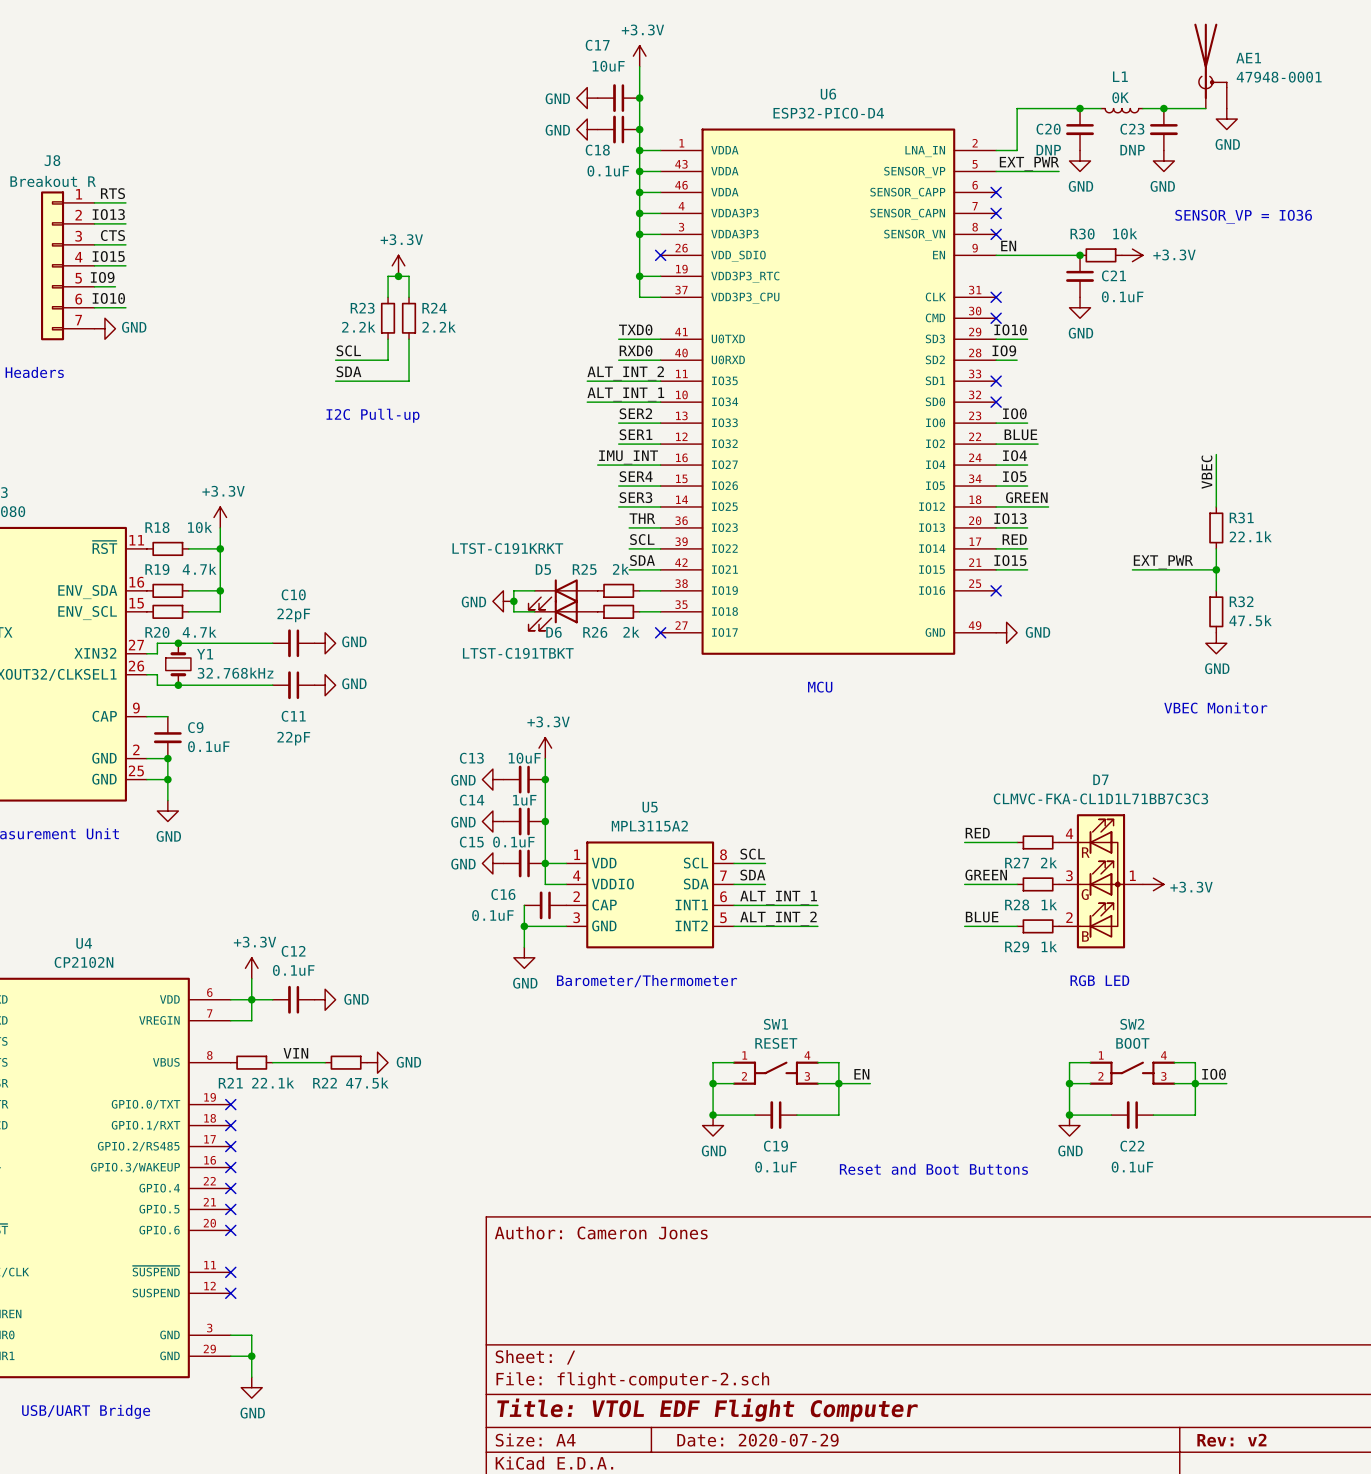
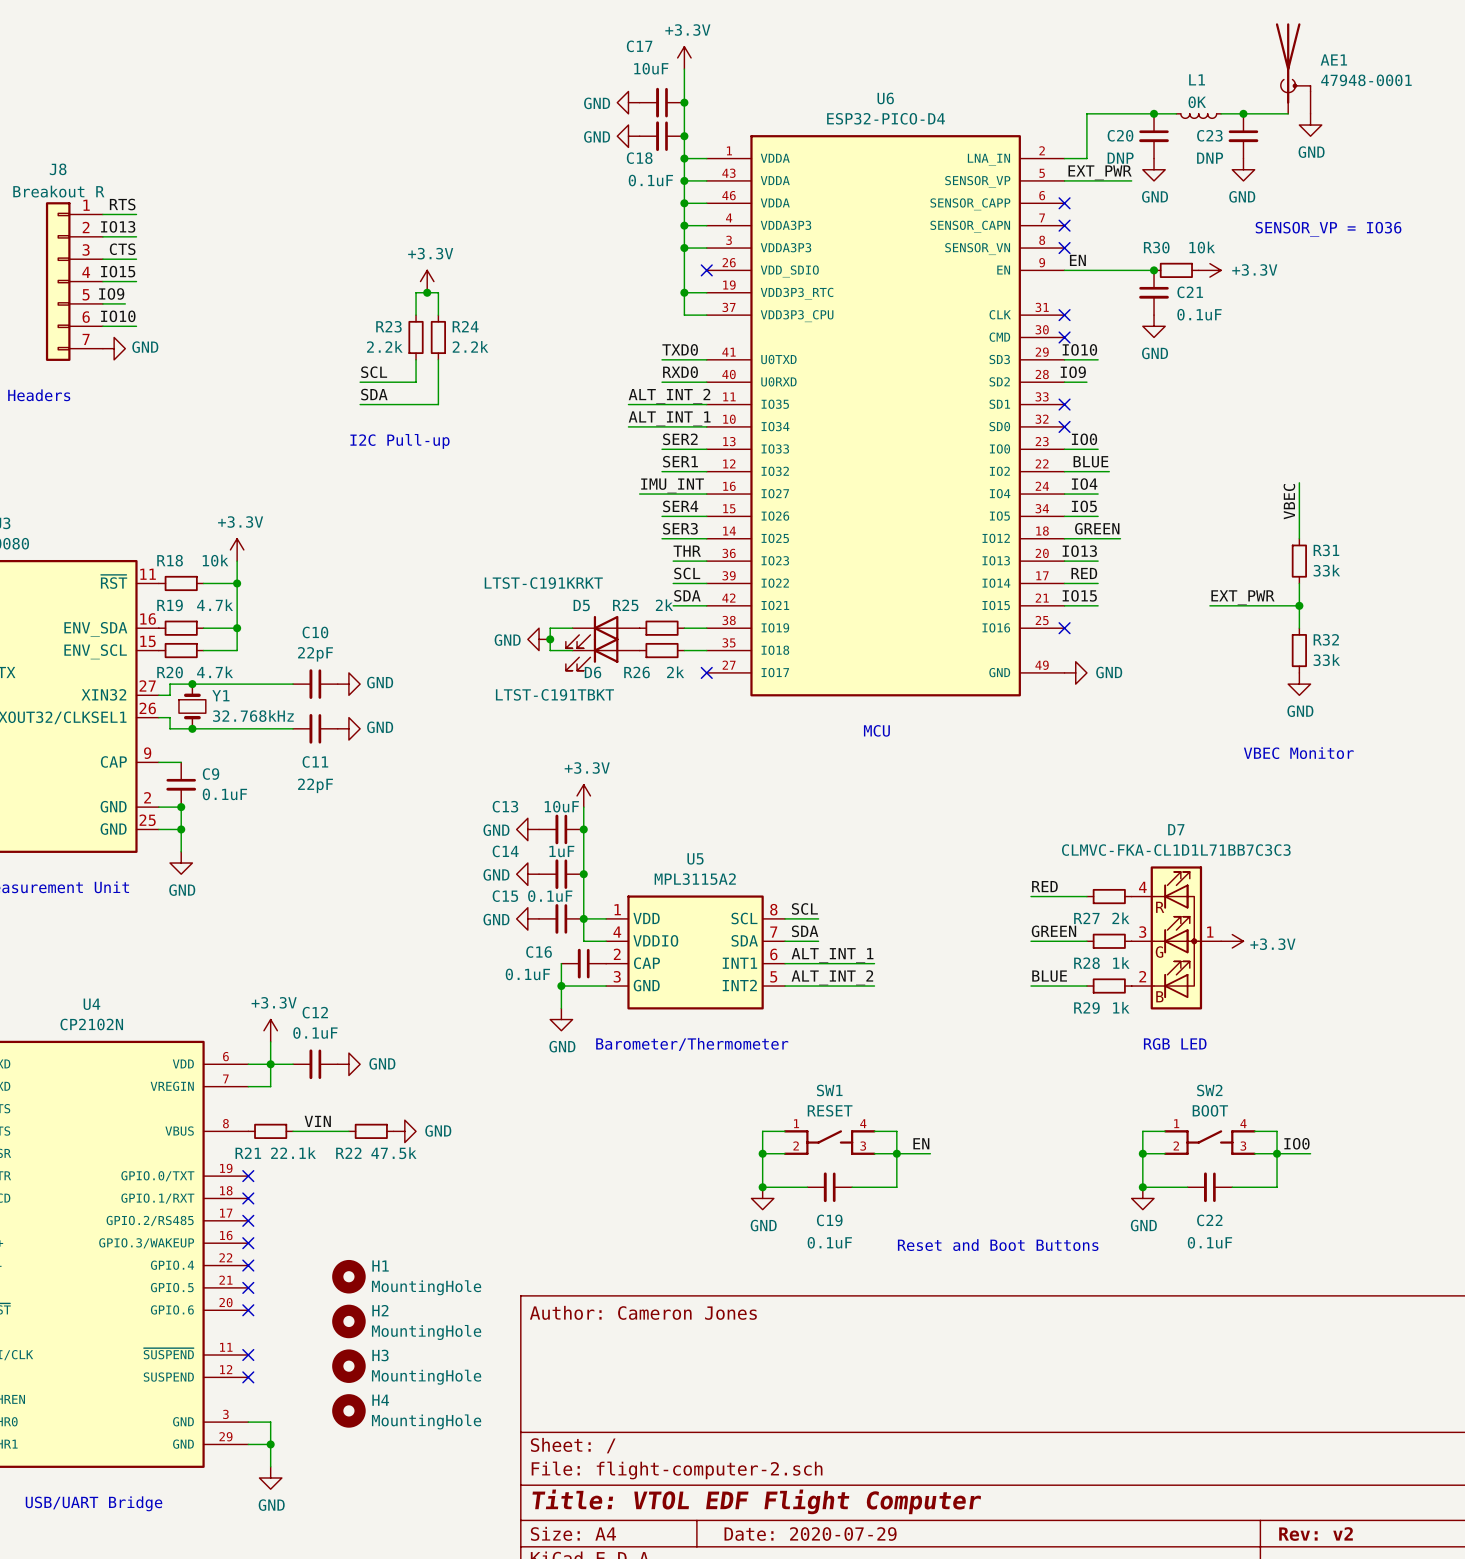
R31 value: 22.1k (1250, 536) -> 33k (1326, 570)
R32 value: 47.5k (1250, 620) -> 33k (1326, 660)
H1: none -> MountingHole (348, 1276)
H2: none -> MountingHole (348, 1321)
H3: none -> MountingHole (348, 1366)
H4: none -> MountingHole (348, 1410)

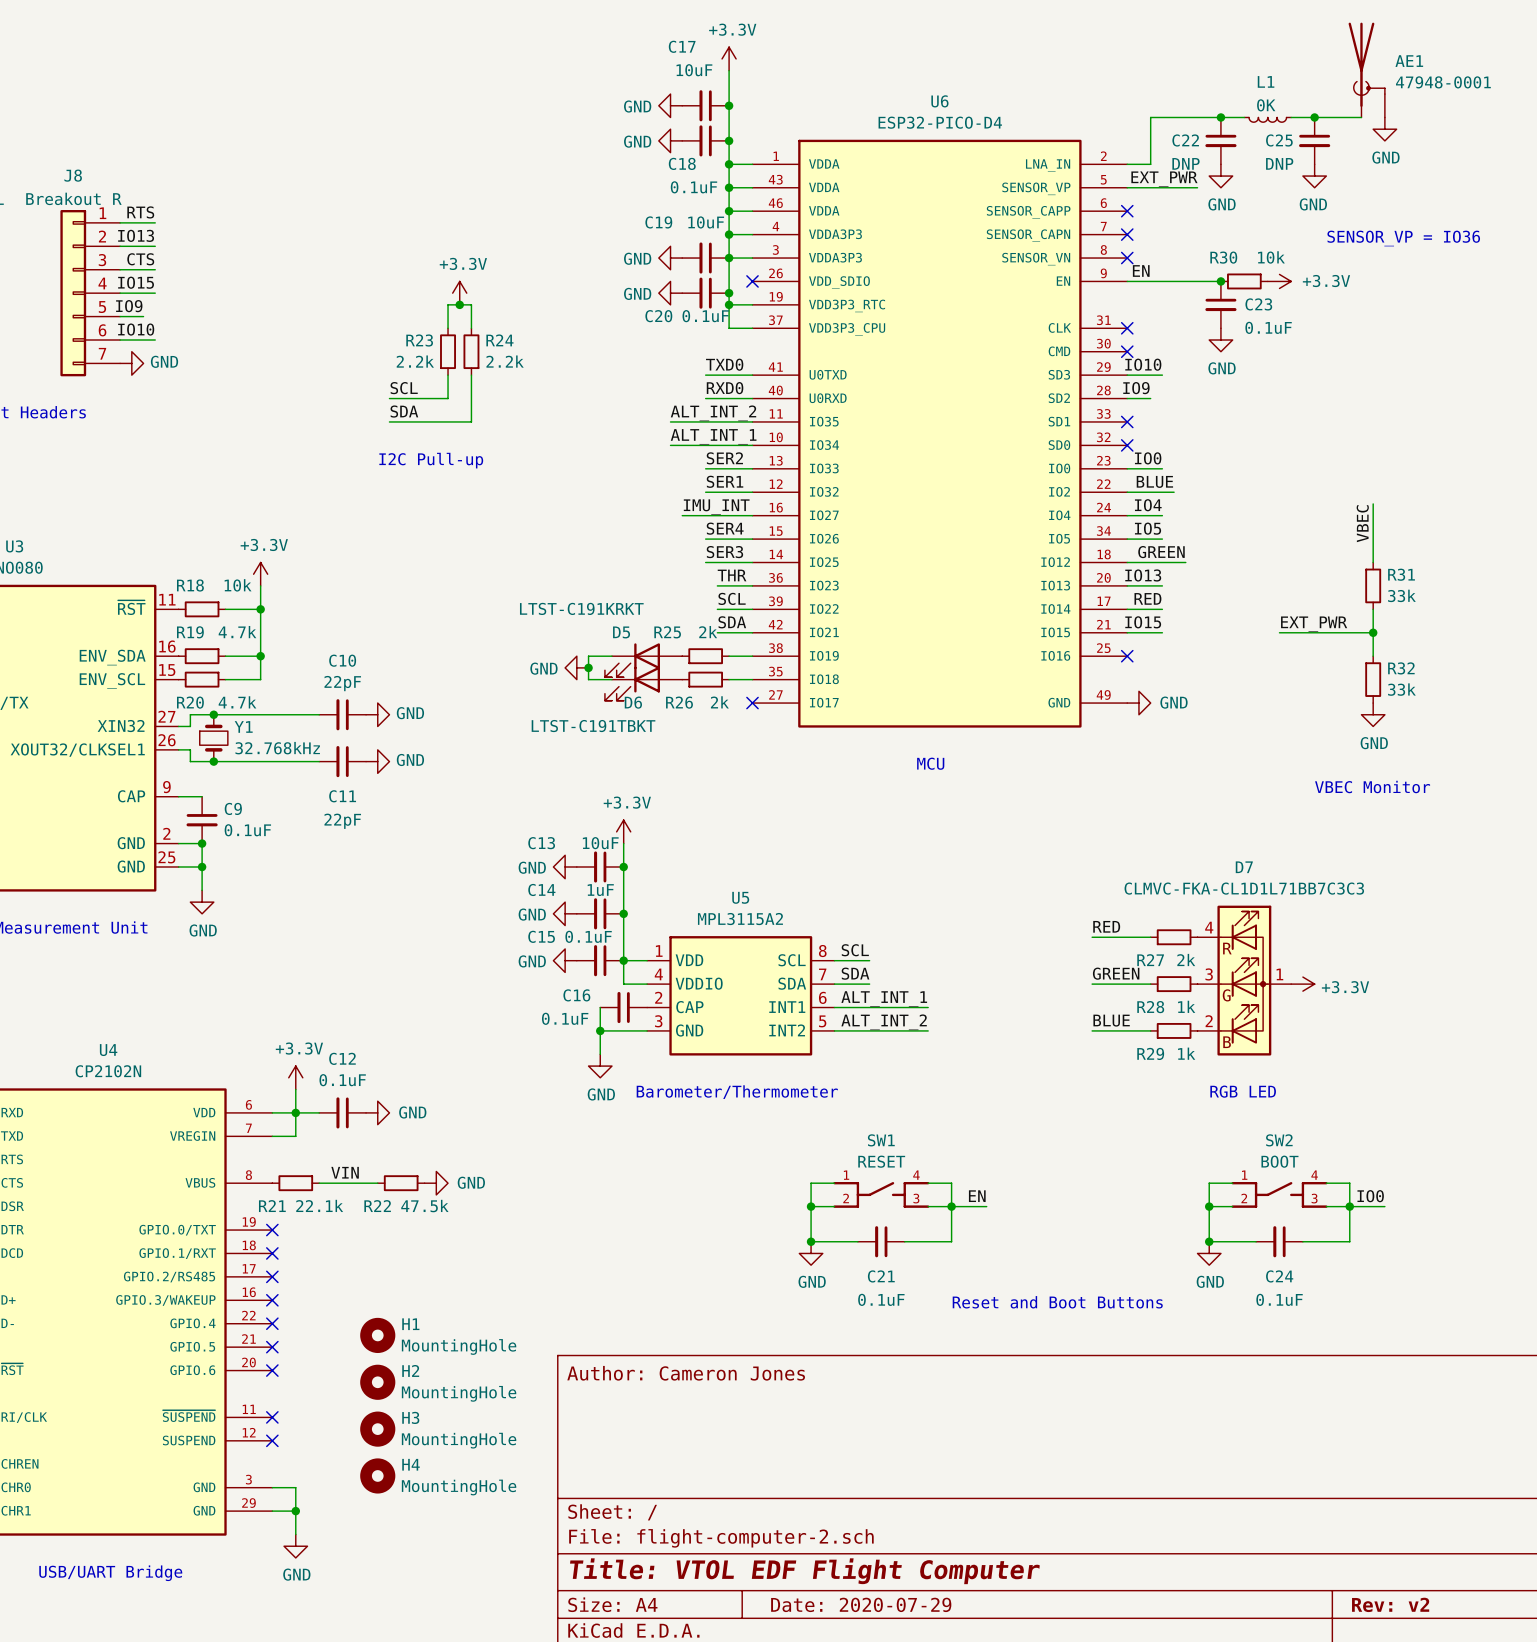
C20 name: C20 (1120, 135) -> C22 (1185, 140)
C23 name: C23 (1209, 135) -> C25 (1279, 140)
power symbol: none -> GND (670, 258)
C19: none -> 10uF (705, 258)
power symbol: none -> GND (670, 293)
C20: none -> 0.1uF (705, 293)
junction: none -> (729, 293)
C21 name: C21 (1190, 292) -> C23 (1258, 304)
C19 name: C19 (829, 1220) -> C21 (881, 1276)
C22 name: C22 (1209, 1220) -> C24 (1279, 1276)

